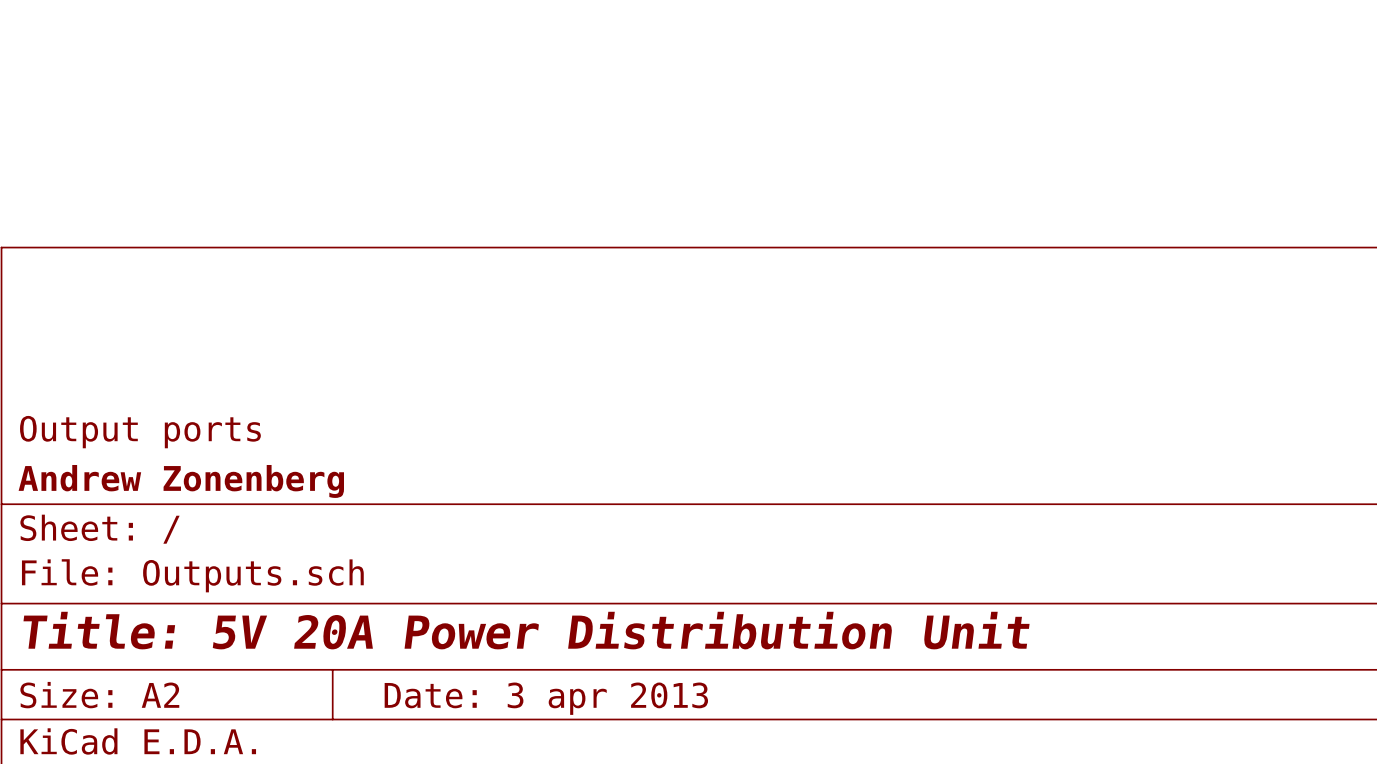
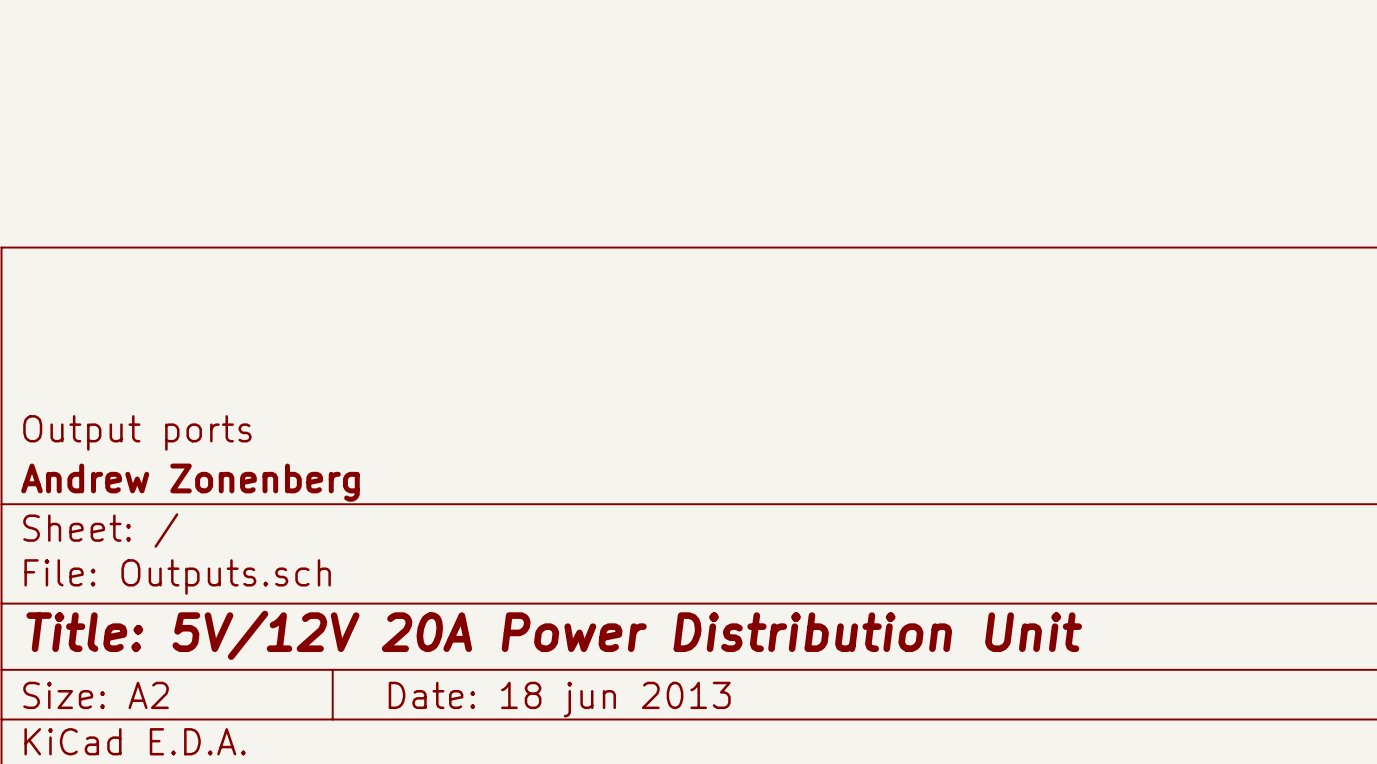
title block: Title: 5V 20A Power Distribution Unit (526, 630) -> Title: 5V/12V 20A Power Distribution Unit (554, 635)
title block: Date: 3 apr 2013 (546, 698) -> Date: 18 jun 2013 (559, 699)

